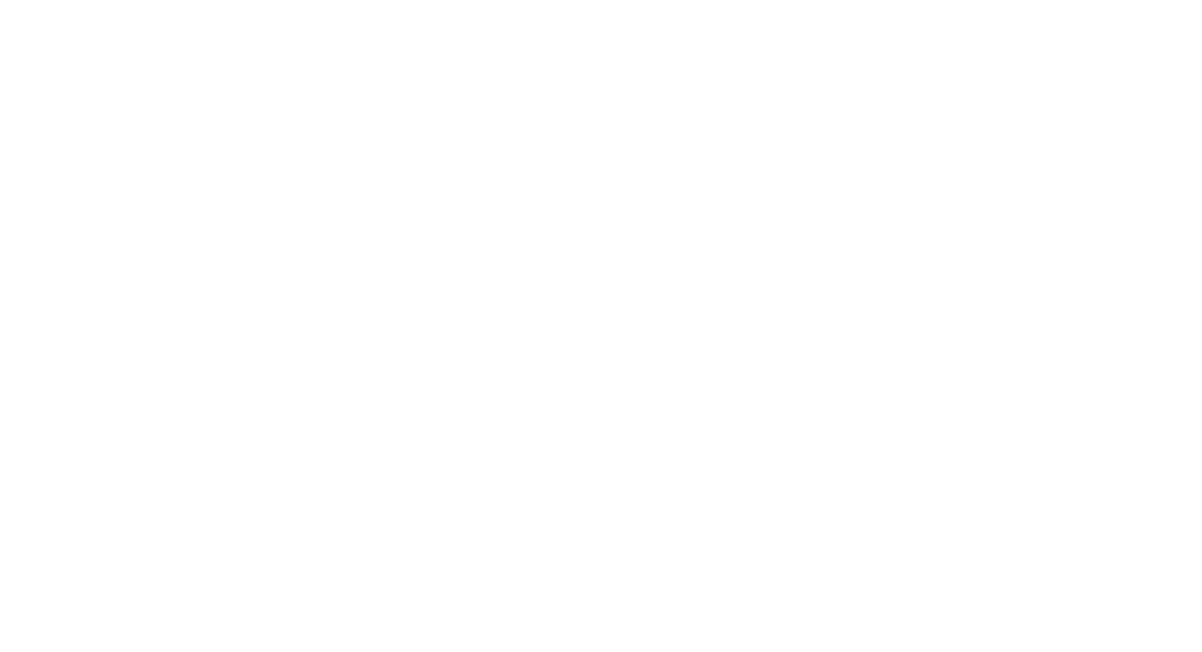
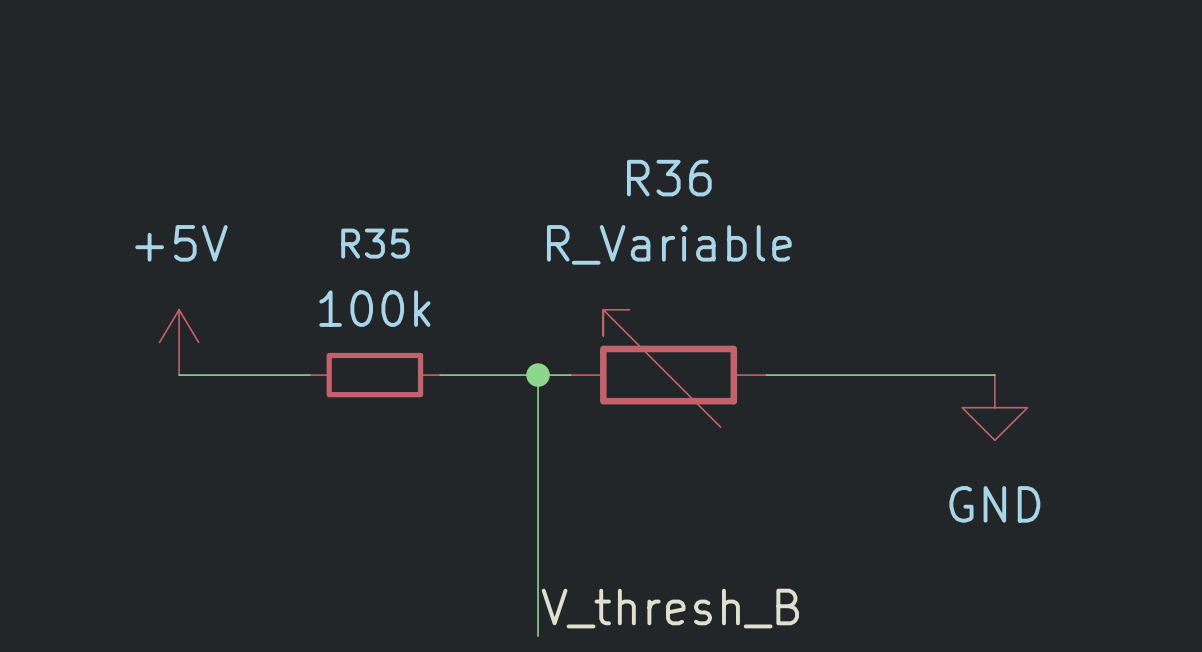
power symbol: none -> +5V (179, 342)
R36: none -> R_Variable (668, 368)
wire: none -> (179, 375) (309, 375)
R35: none -> 100k (374, 375)
wire: none -> (440, 375) (570, 375)
wire: none -> (538, 375) (538, 636)
junction: none -> (538, 375)
wire: none -> (766, 375) (994, 375)
power symbol: none -> GND (994, 407)
label: none -> V_thresh_B (670, 608)

